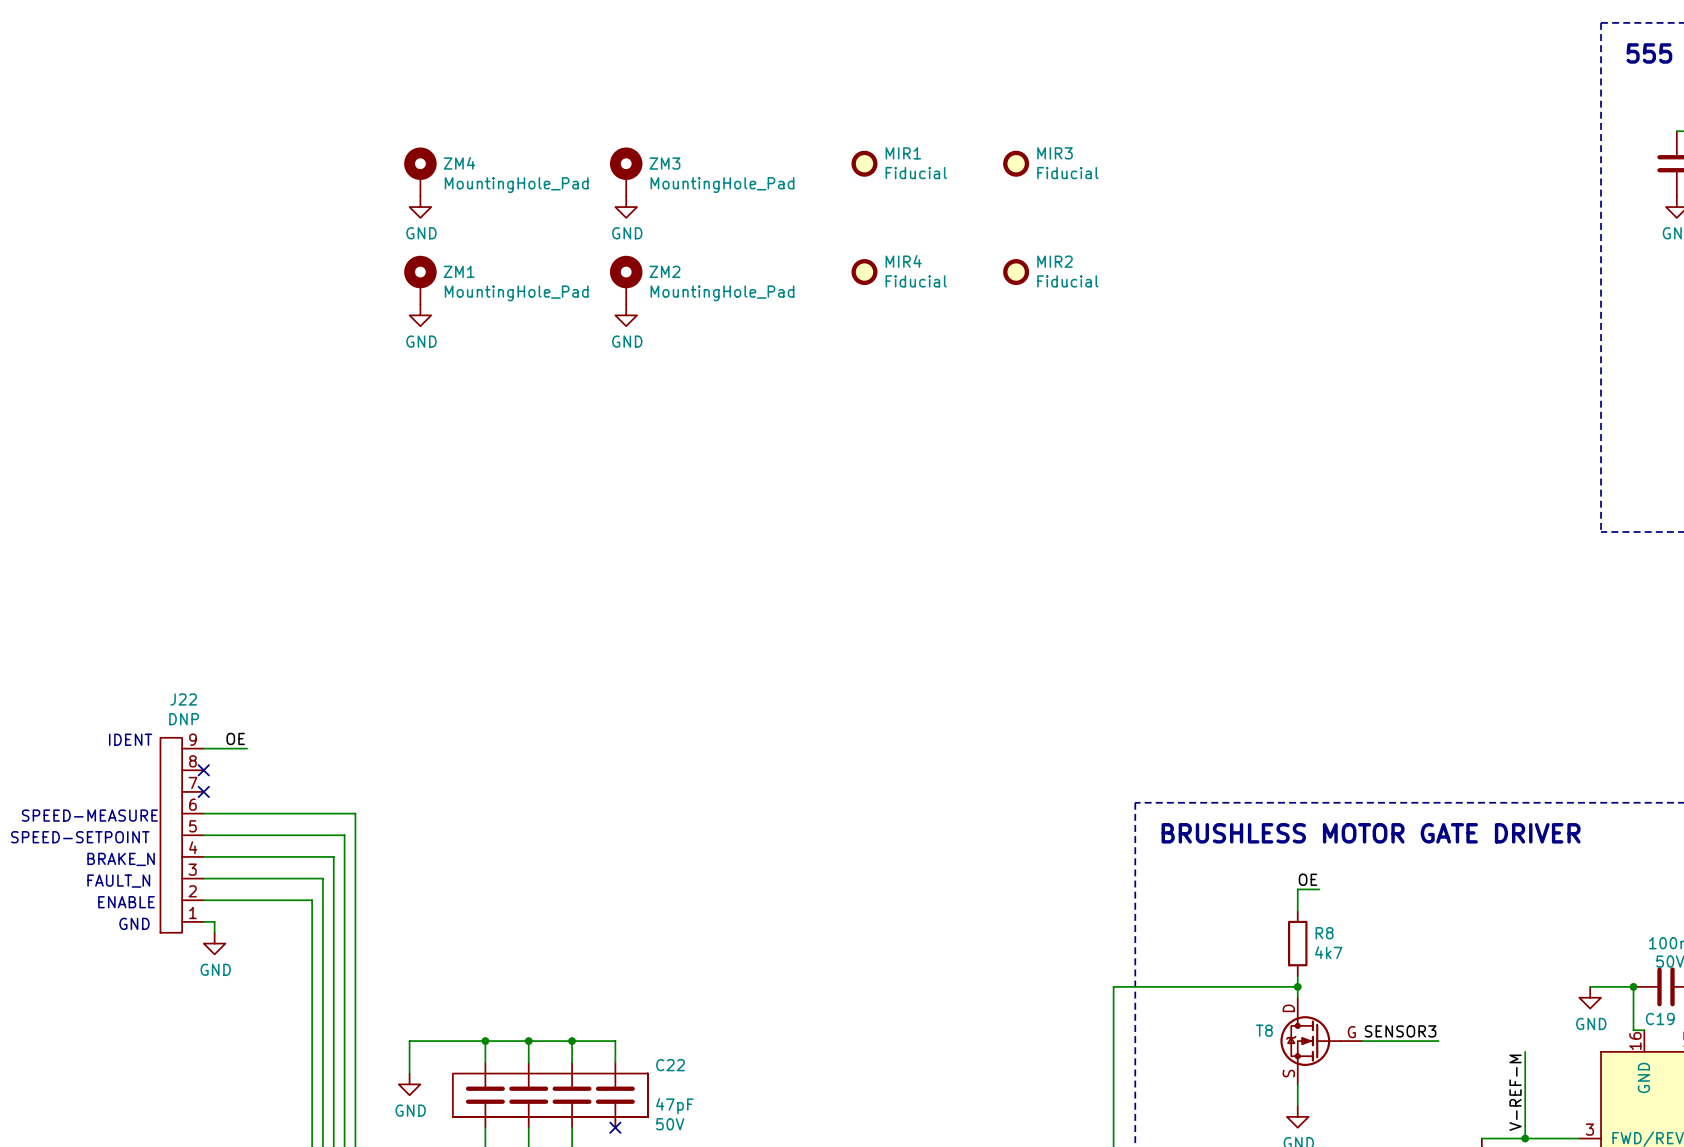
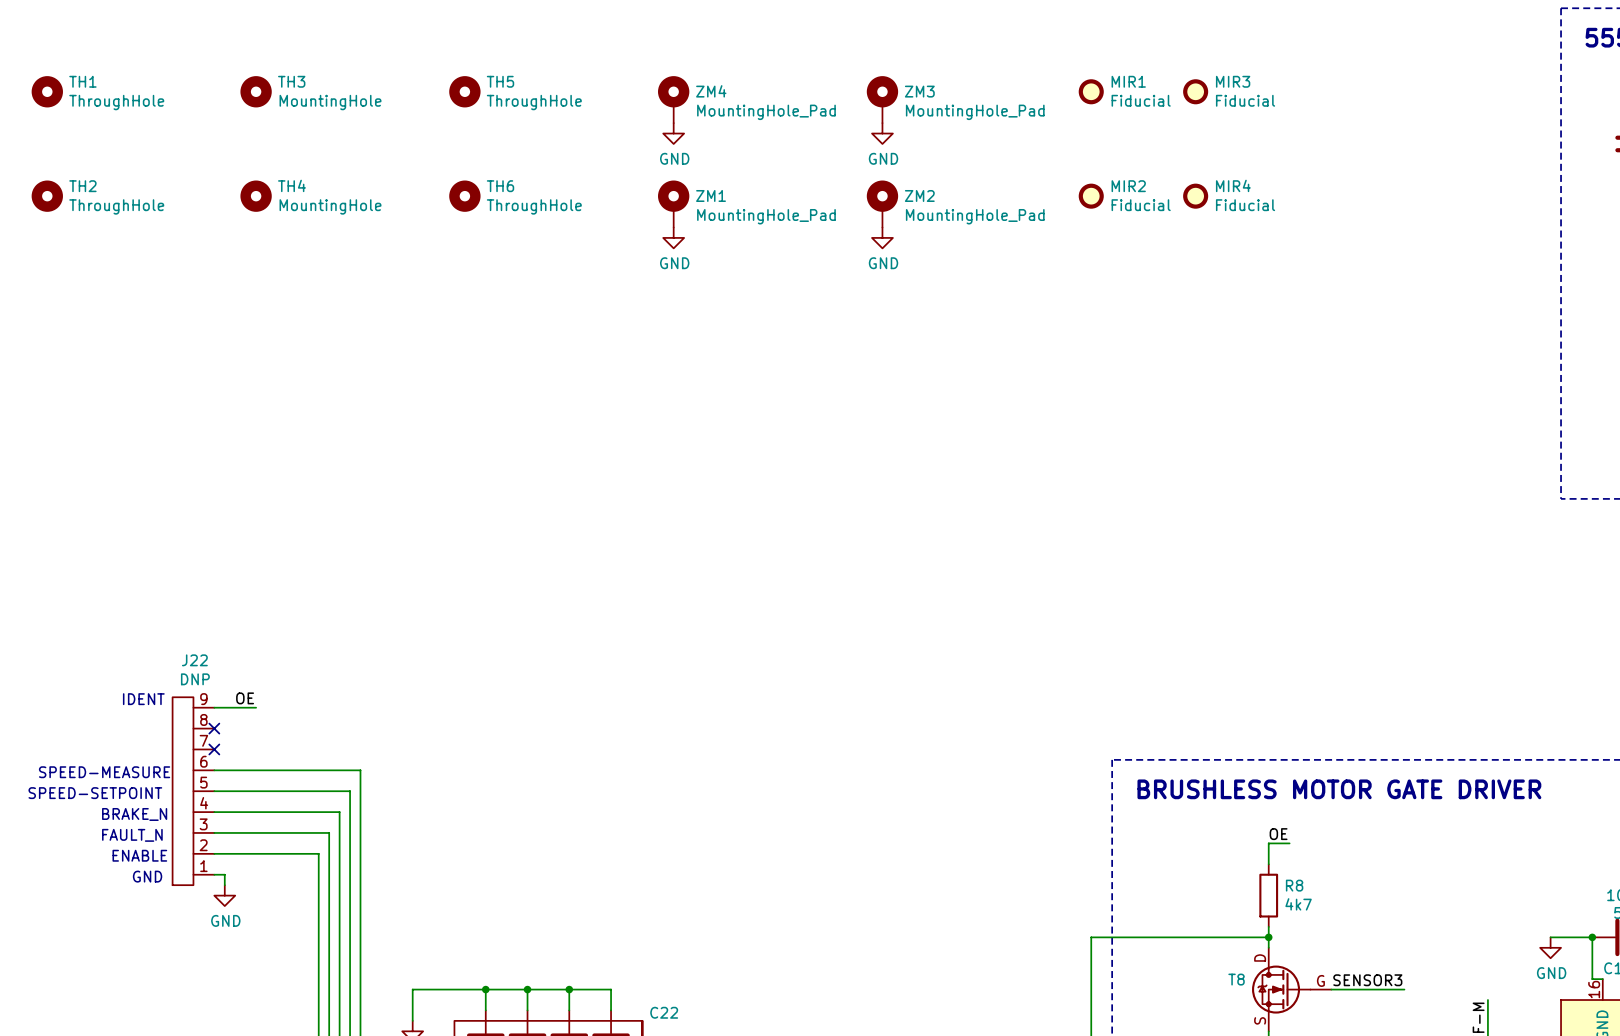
TH1: none -> ThroughHole (47, 91)
TH3: none -> MountingHole (256, 91)
TH5: none -> ThroughHole (464, 91)
power symbol: none -> GND (673, 133)
power symbol: none -> GND (882, 133)
MIR1 position: (864, 163) -> (1091, 91)
MIR3 position: (1016, 163) -> (1195, 91)
ZM4 position: (420, 171) -> (673, 99)
ZM3 position: (626, 171) -> (882, 99)
power symbol: GND (420, 207) -> none
power symbol: GND (626, 207) -> none
TH2: none -> ThroughHole (47, 196)
TH4: none -> MountingHole (256, 196)
TH6: none -> ThroughHole (464, 196)
power symbol: none -> GND (673, 237)
power symbol: none -> GND (882, 237)
MIR4 position: (864, 272) -> (1195, 196)
MIR2 position: (1016, 272) -> (1091, 196)
ZM1 position: (420, 280) -> (673, 204)
ZM2 position: (626, 280) -> (882, 204)
power symbol: GND (420, 315) -> none
power symbol: GND (626, 315) -> none

